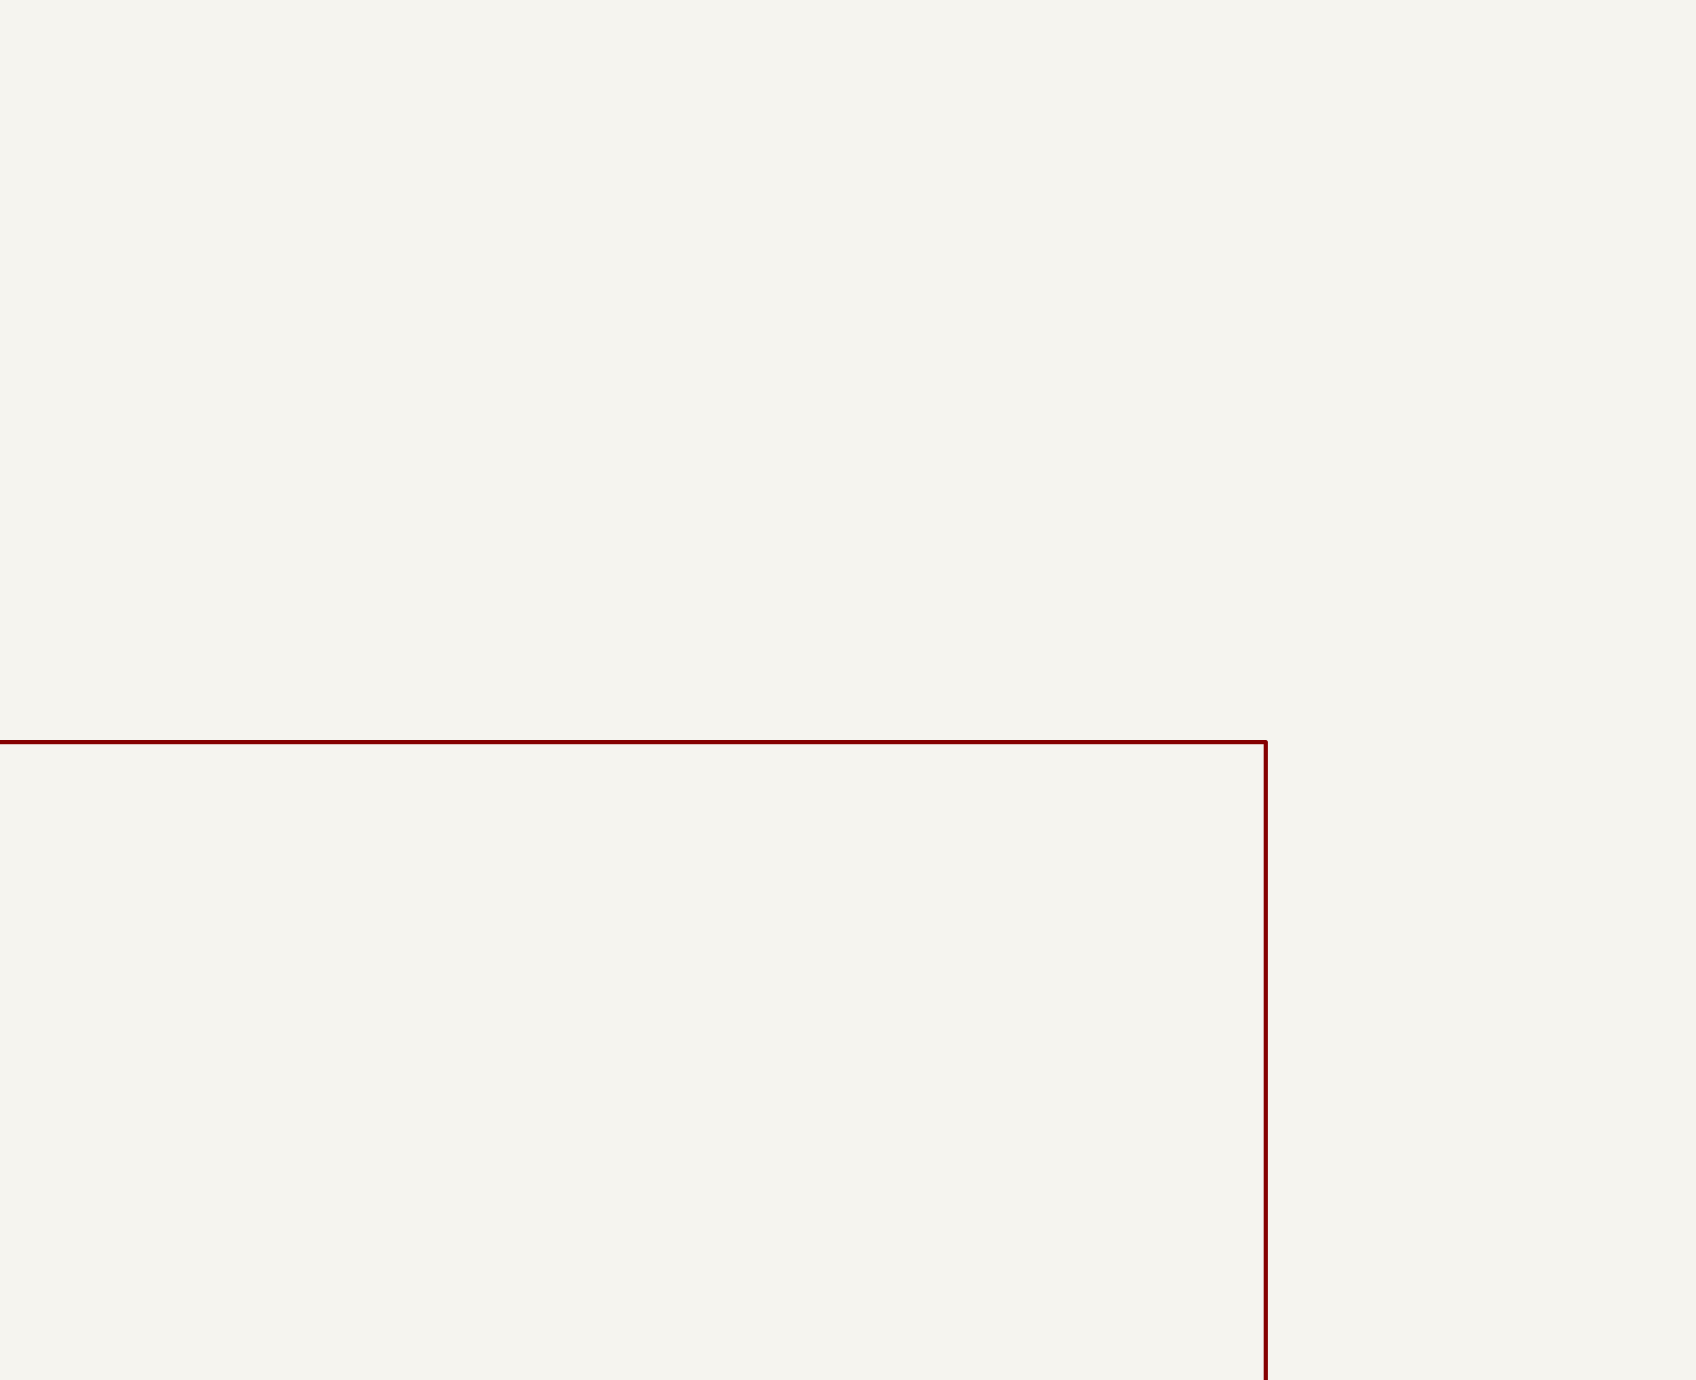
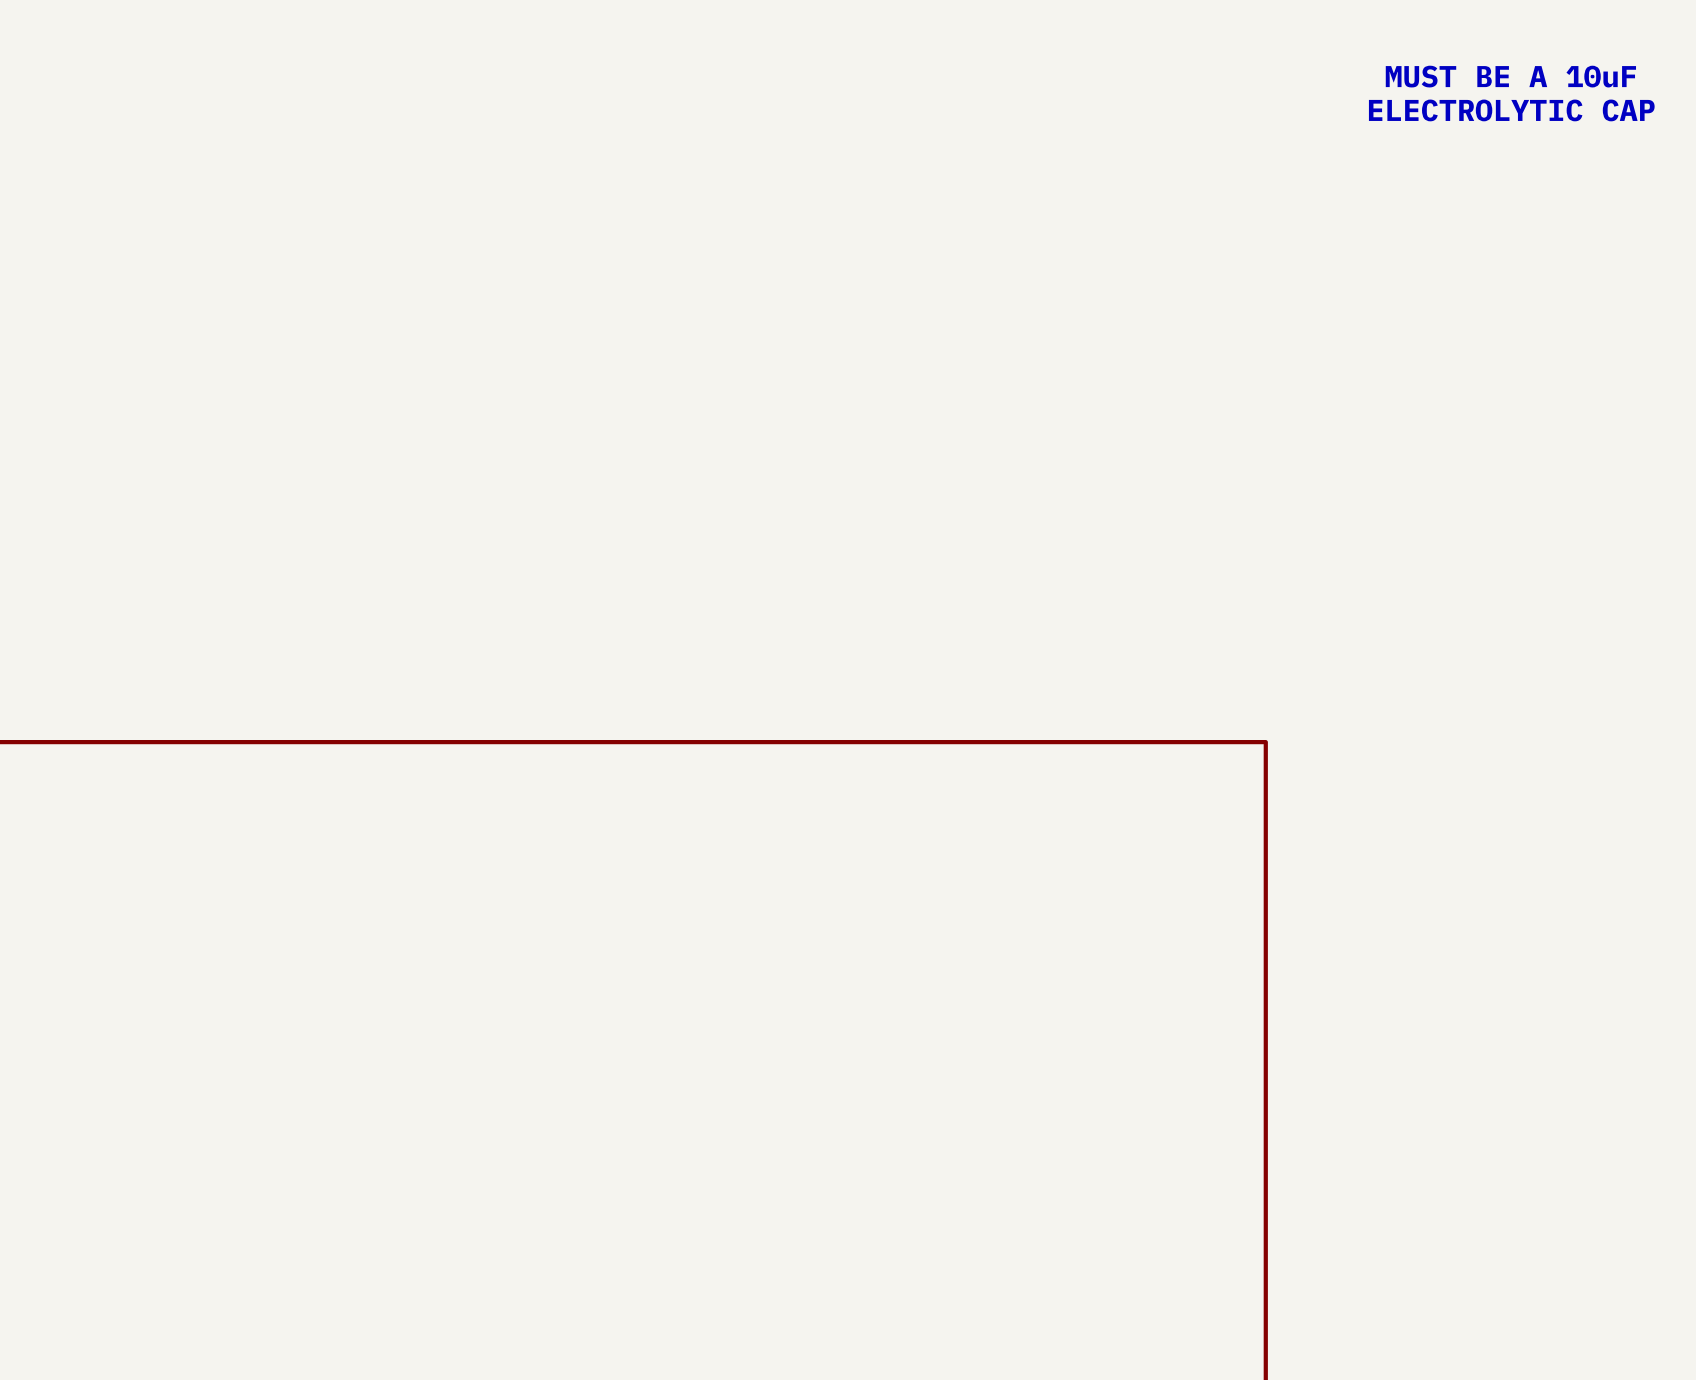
text: none -> MUST BE A 10uF (1510, 76)
text: none -> ELECTROLYTIC CAP (1511, 110)

